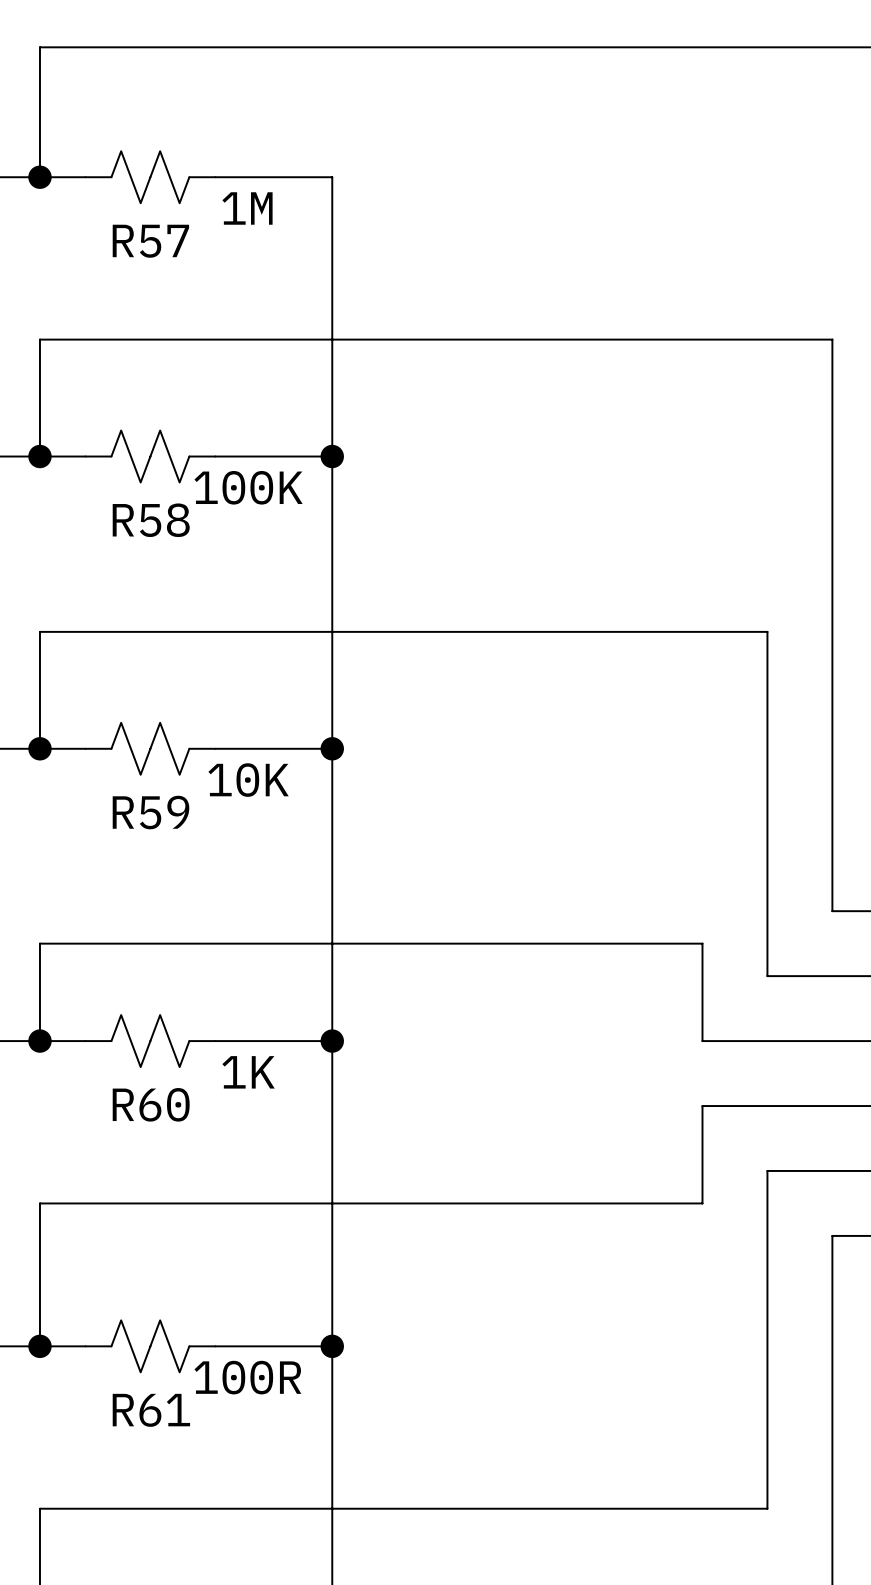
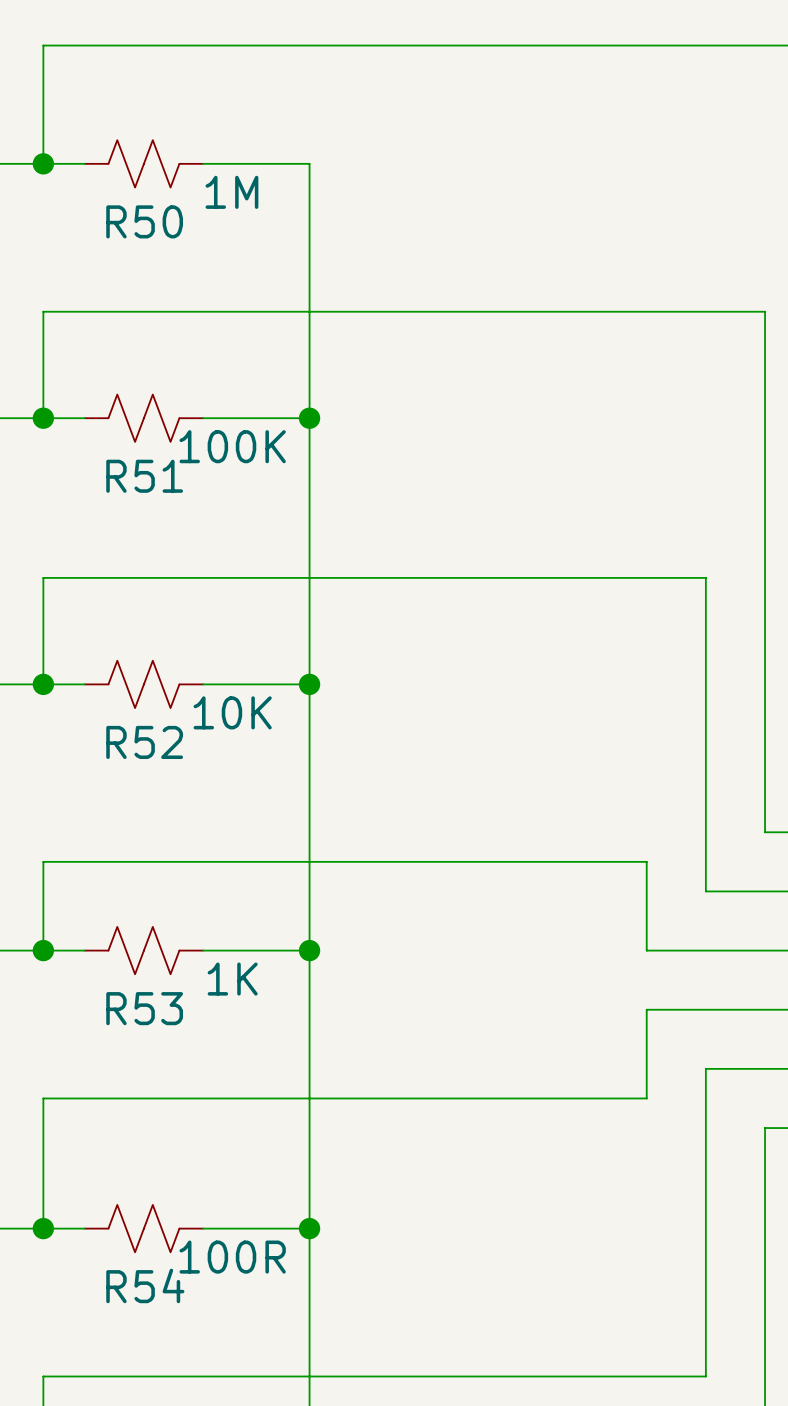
R57 name: R57 (150, 241) -> R50 (144, 221)
R58 name: R58 (151, 520) -> R51 (144, 476)
R59 name: R59 (151, 812) -> R52 (144, 742)
R60 name: R60 (151, 1104) -> R53 (144, 1008)
R61 name: R61 (151, 1410) -> R54 (145, 1285)

